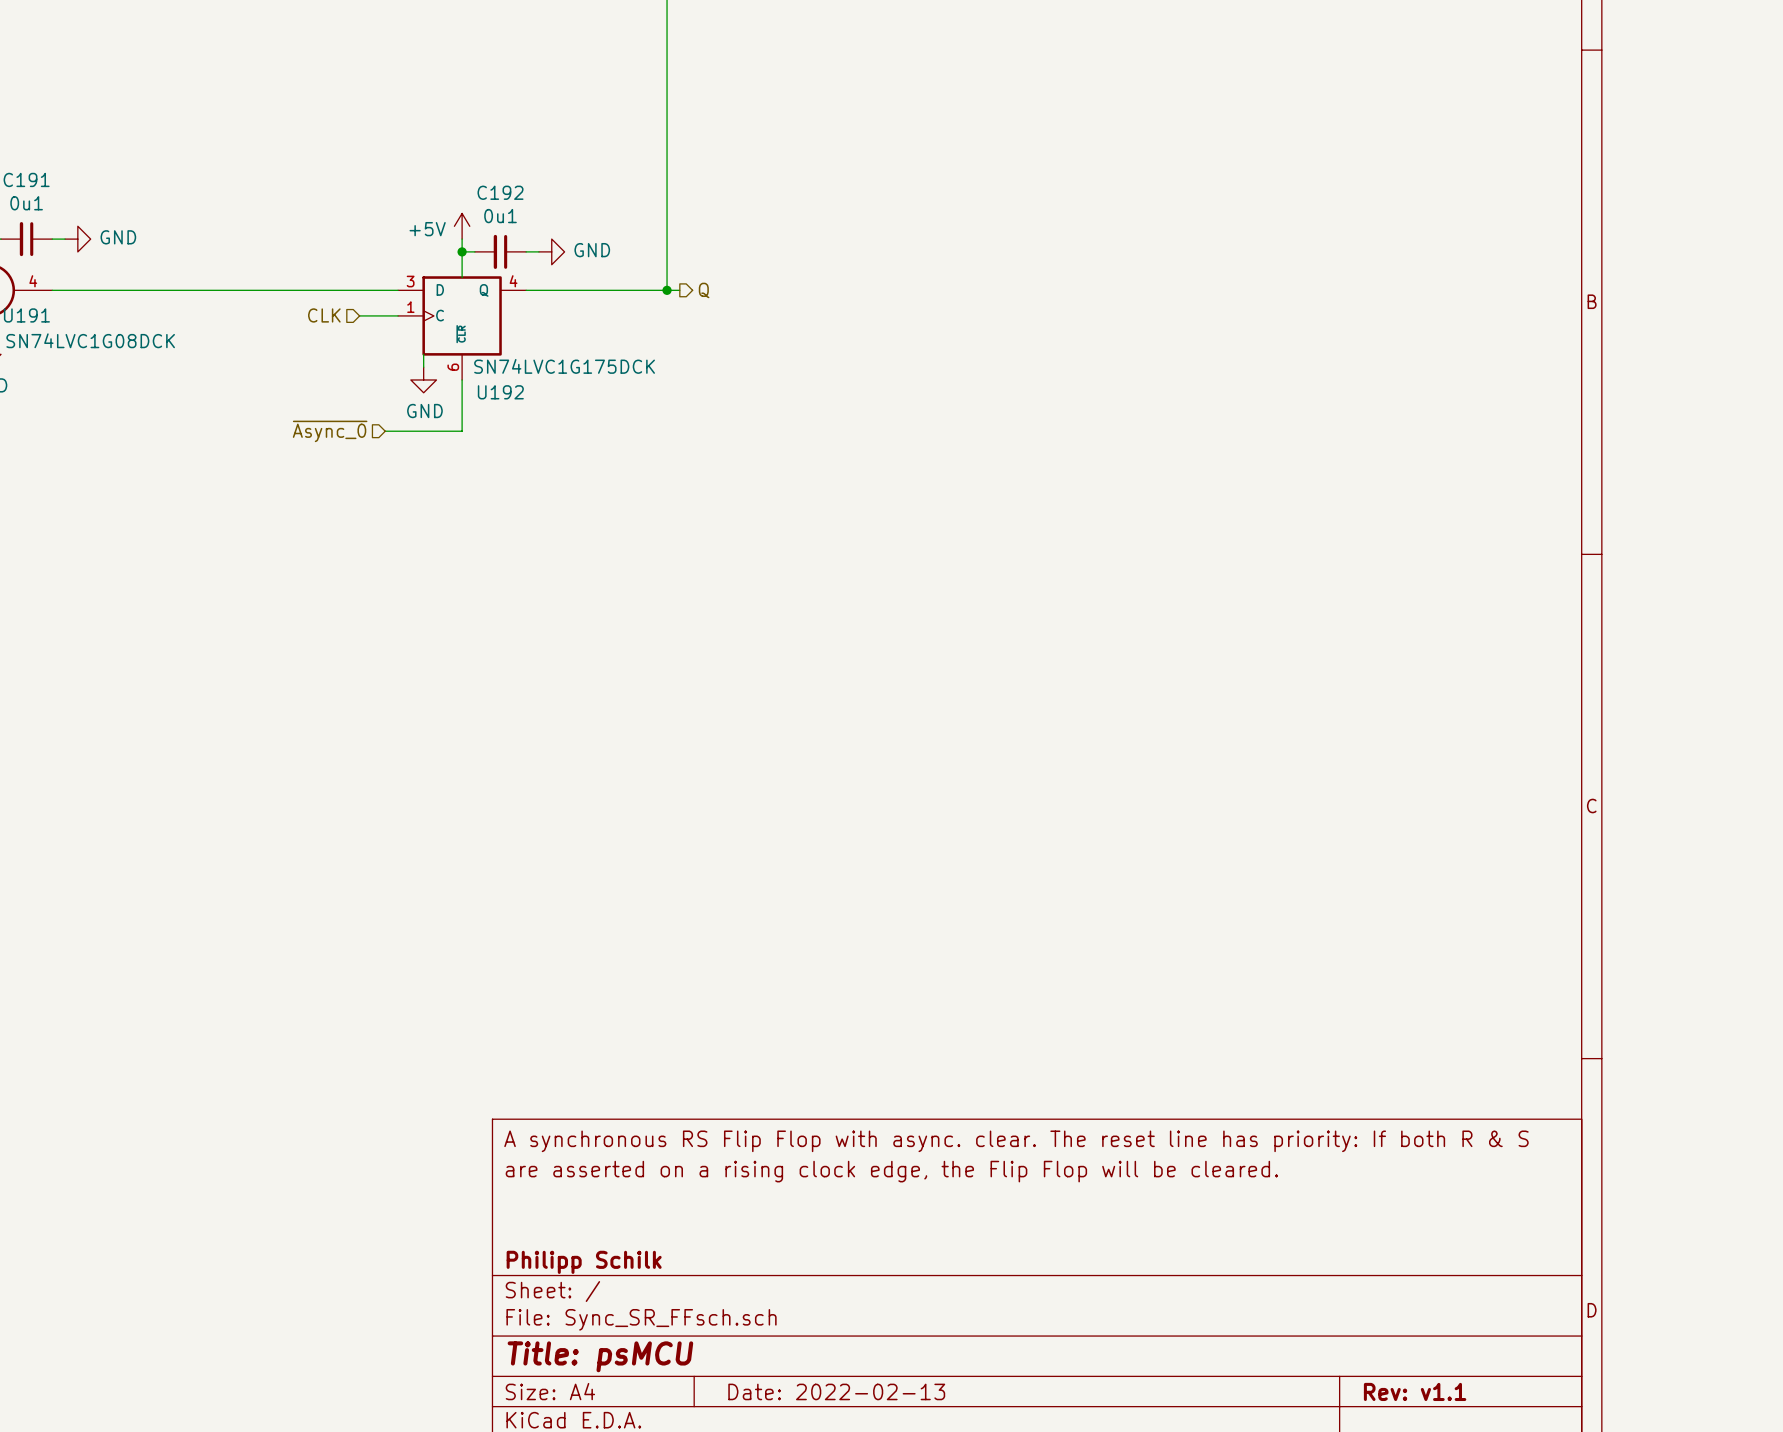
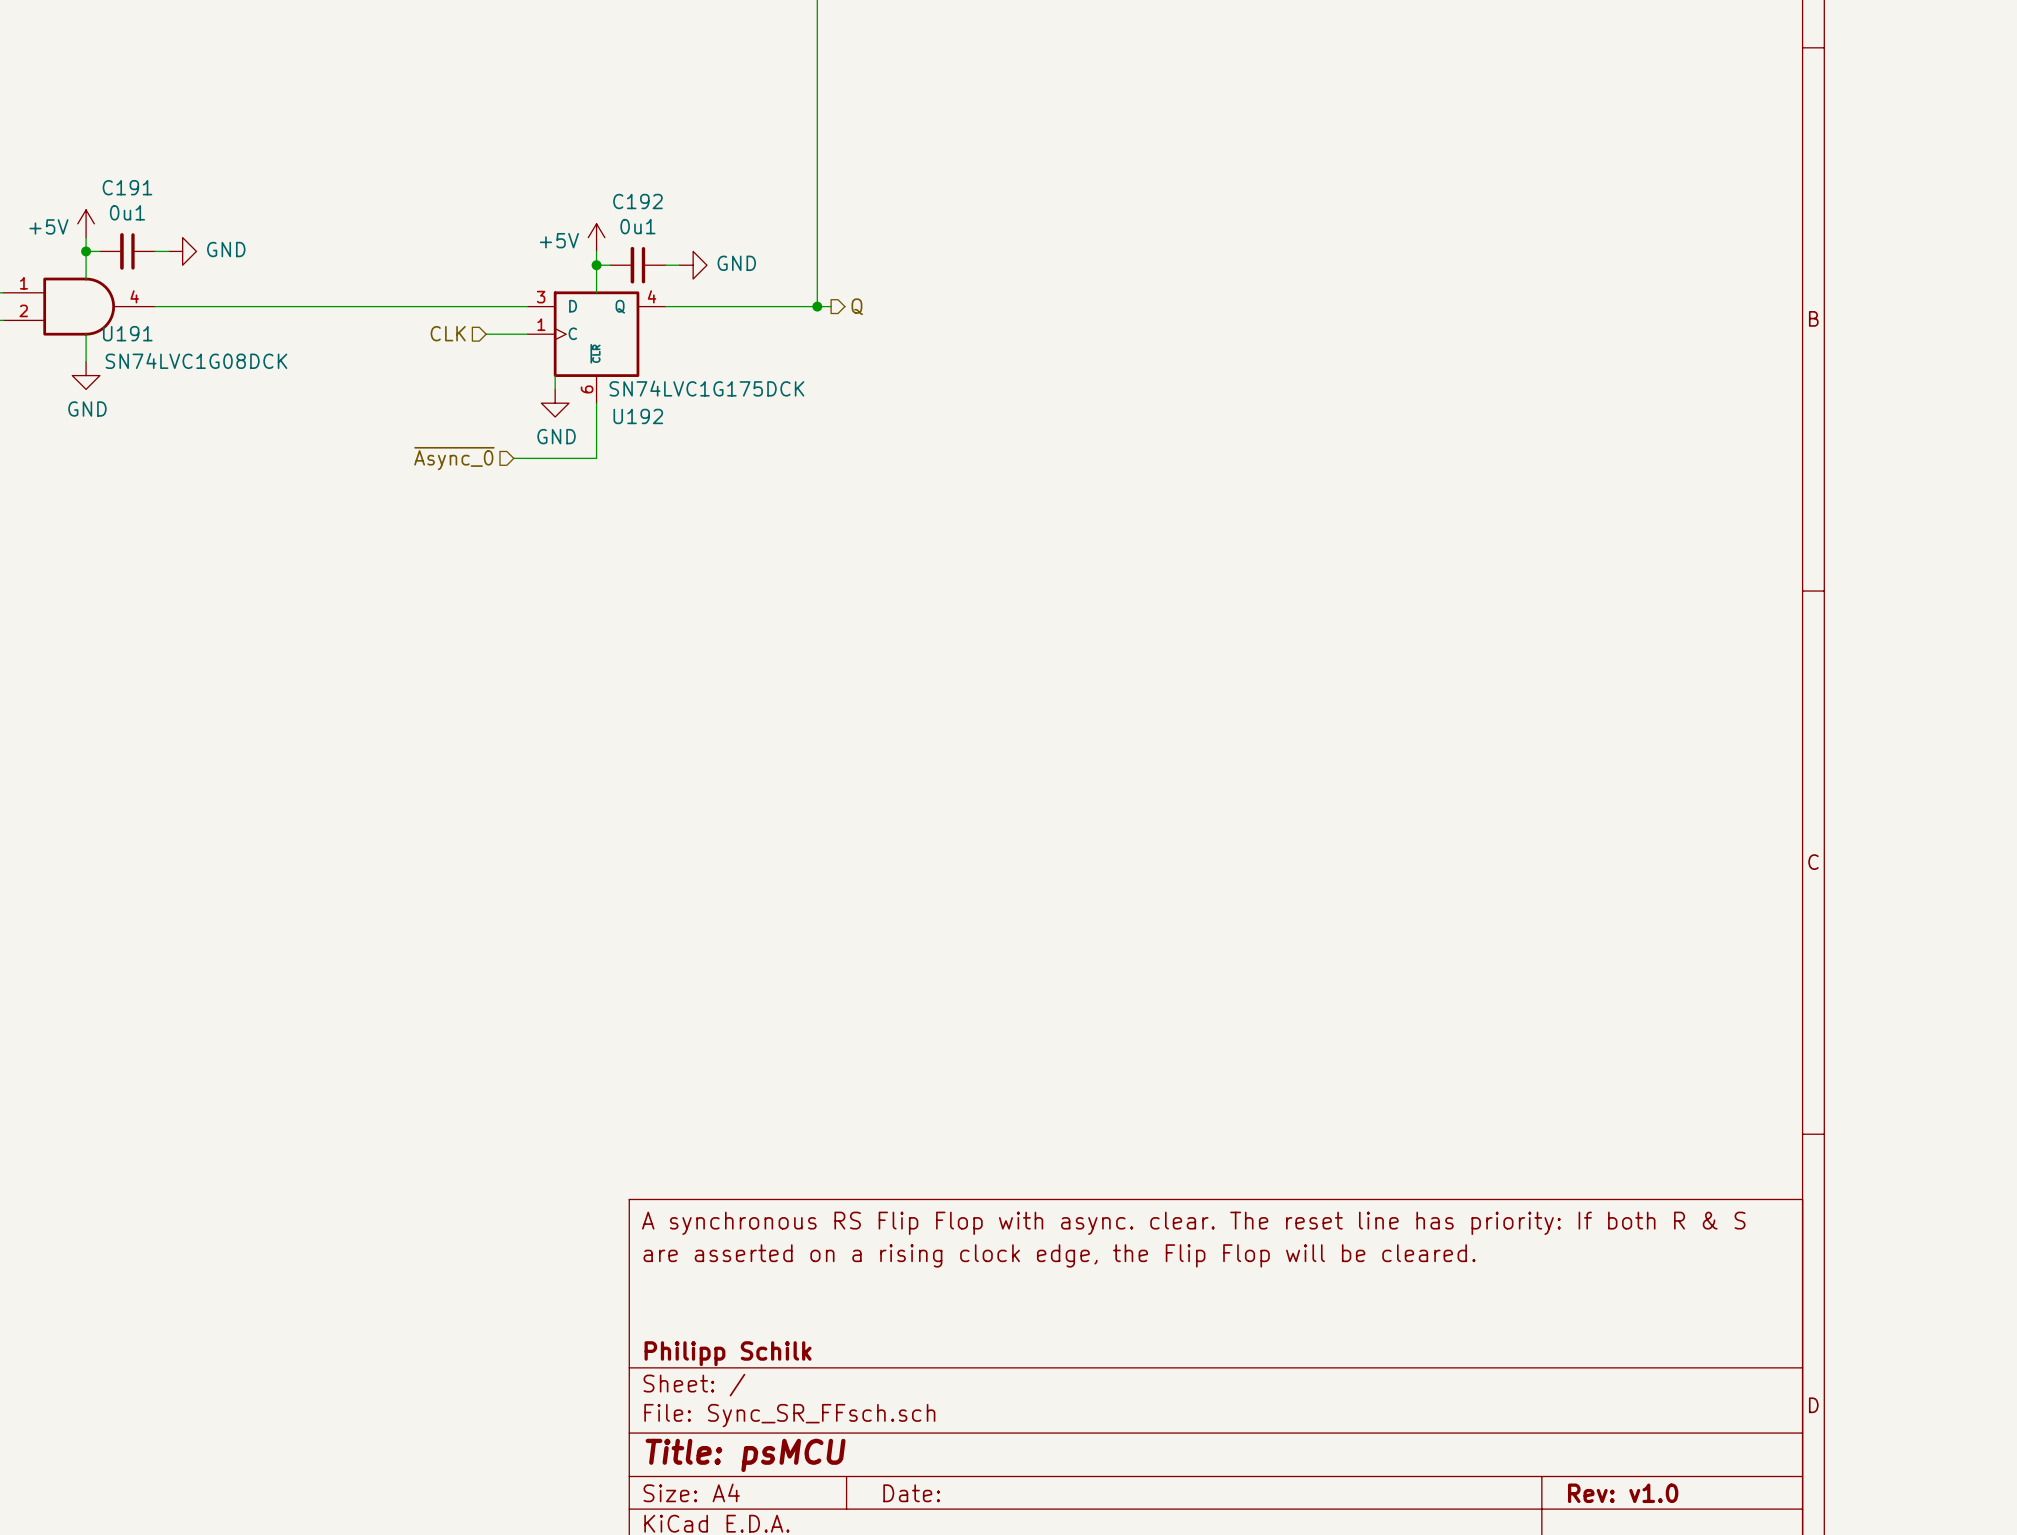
title block: Date: 2022-02-13 (836, 1391) -> Date: (911, 1493)
title block: Rev: v1.1 (1415, 1391) -> Rev: v1.0 (1623, 1493)

